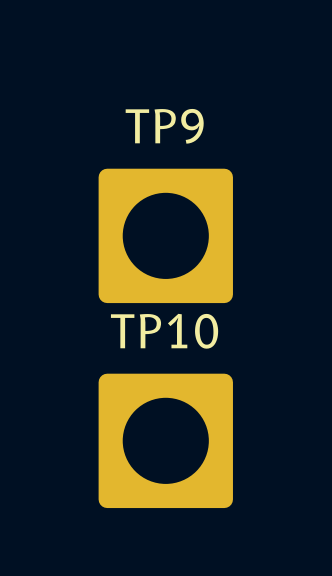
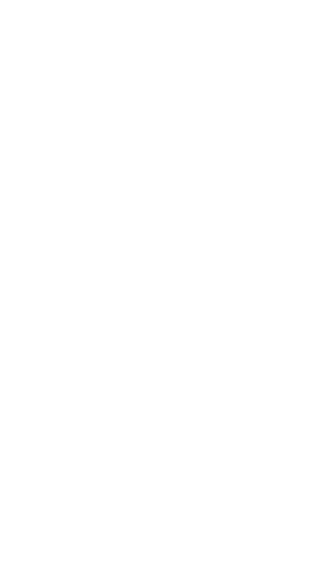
TP9: (165, 235) -> none
TP10: (165, 440) -> none

